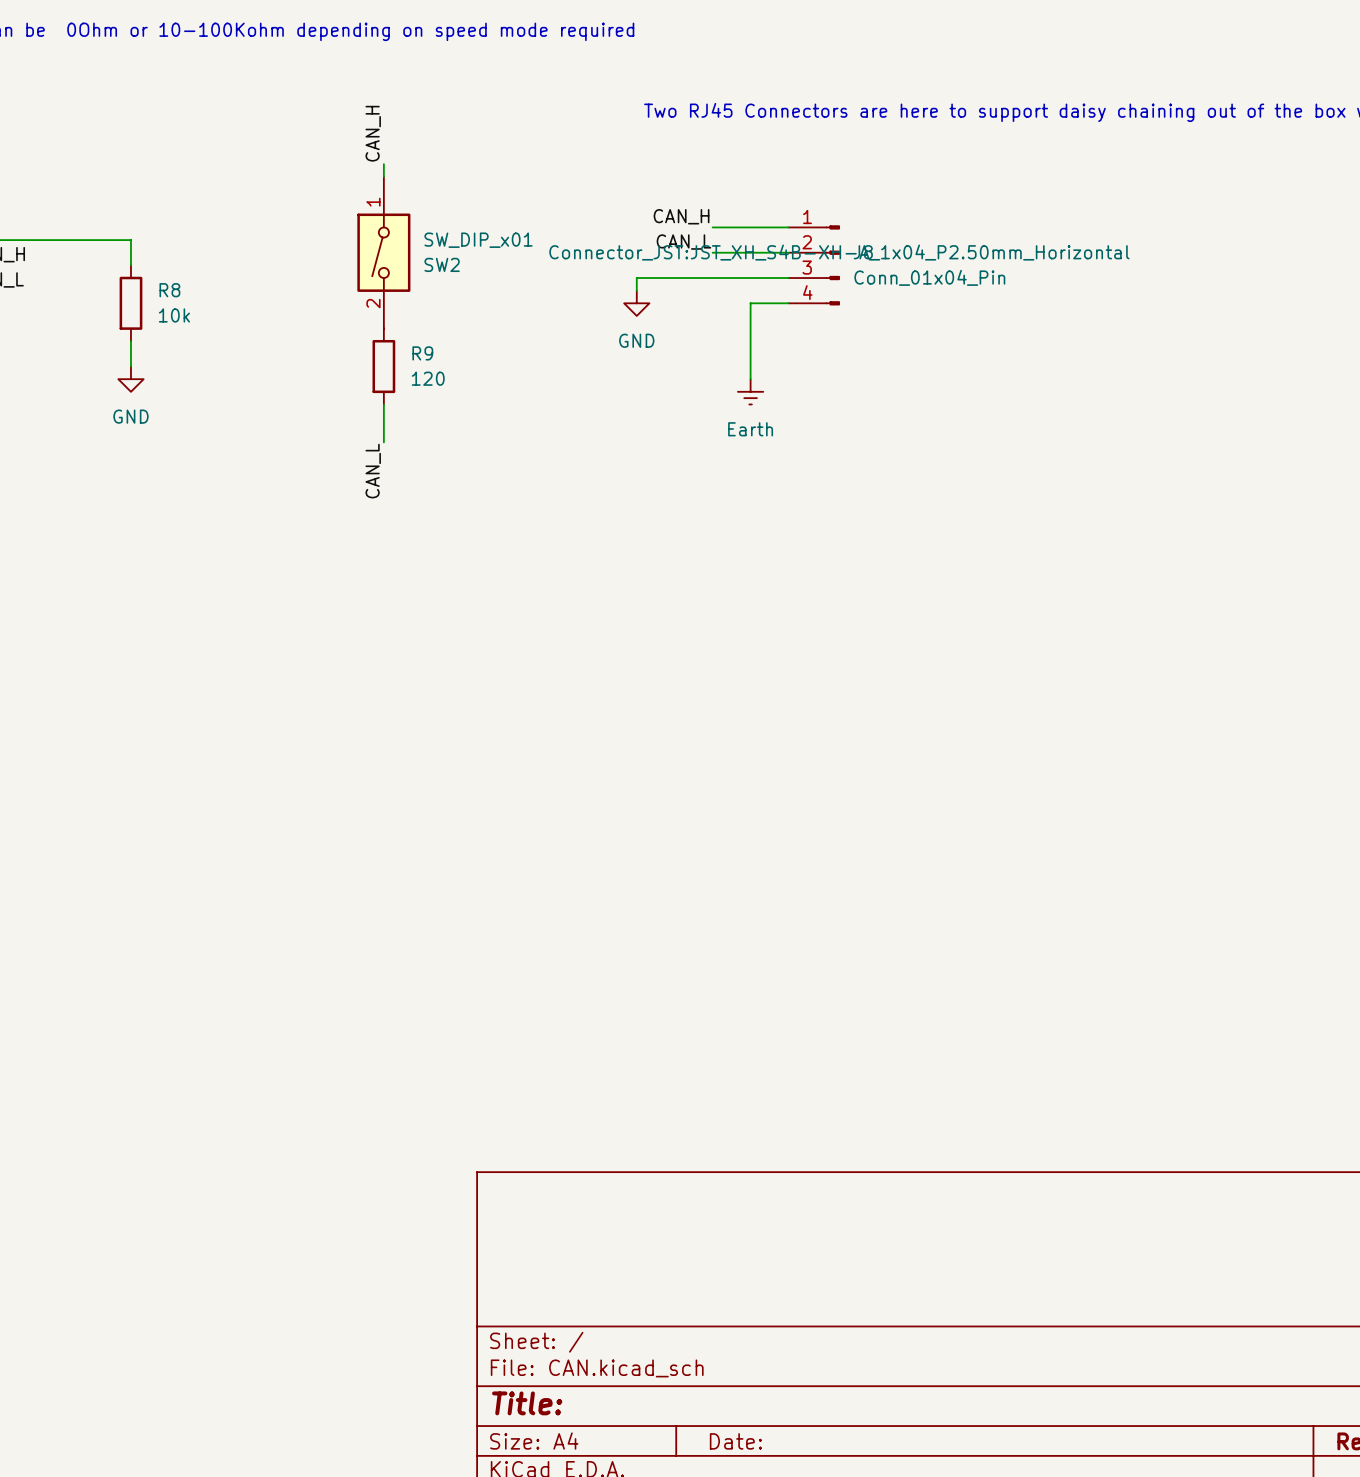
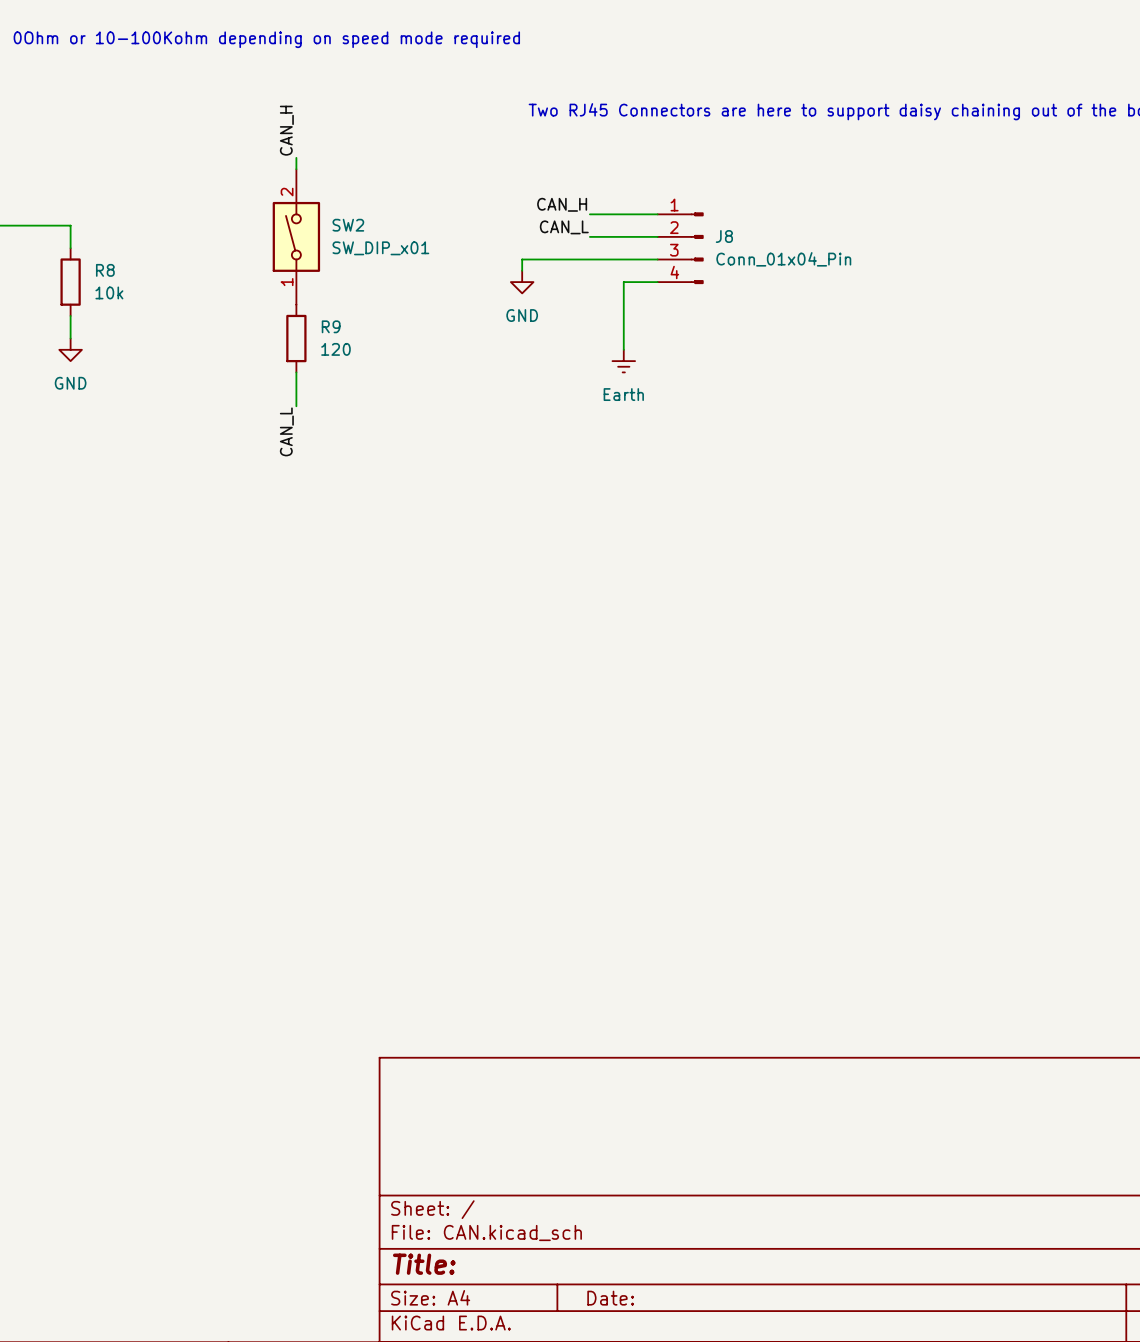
SW2 flip: as is (383, 252) -> up-down (296, 236)
J8 text: Connector_JST:JST_XH_S4B-XH-A_1x04_P2.50mm_Horizontal (839, 252) -> none

